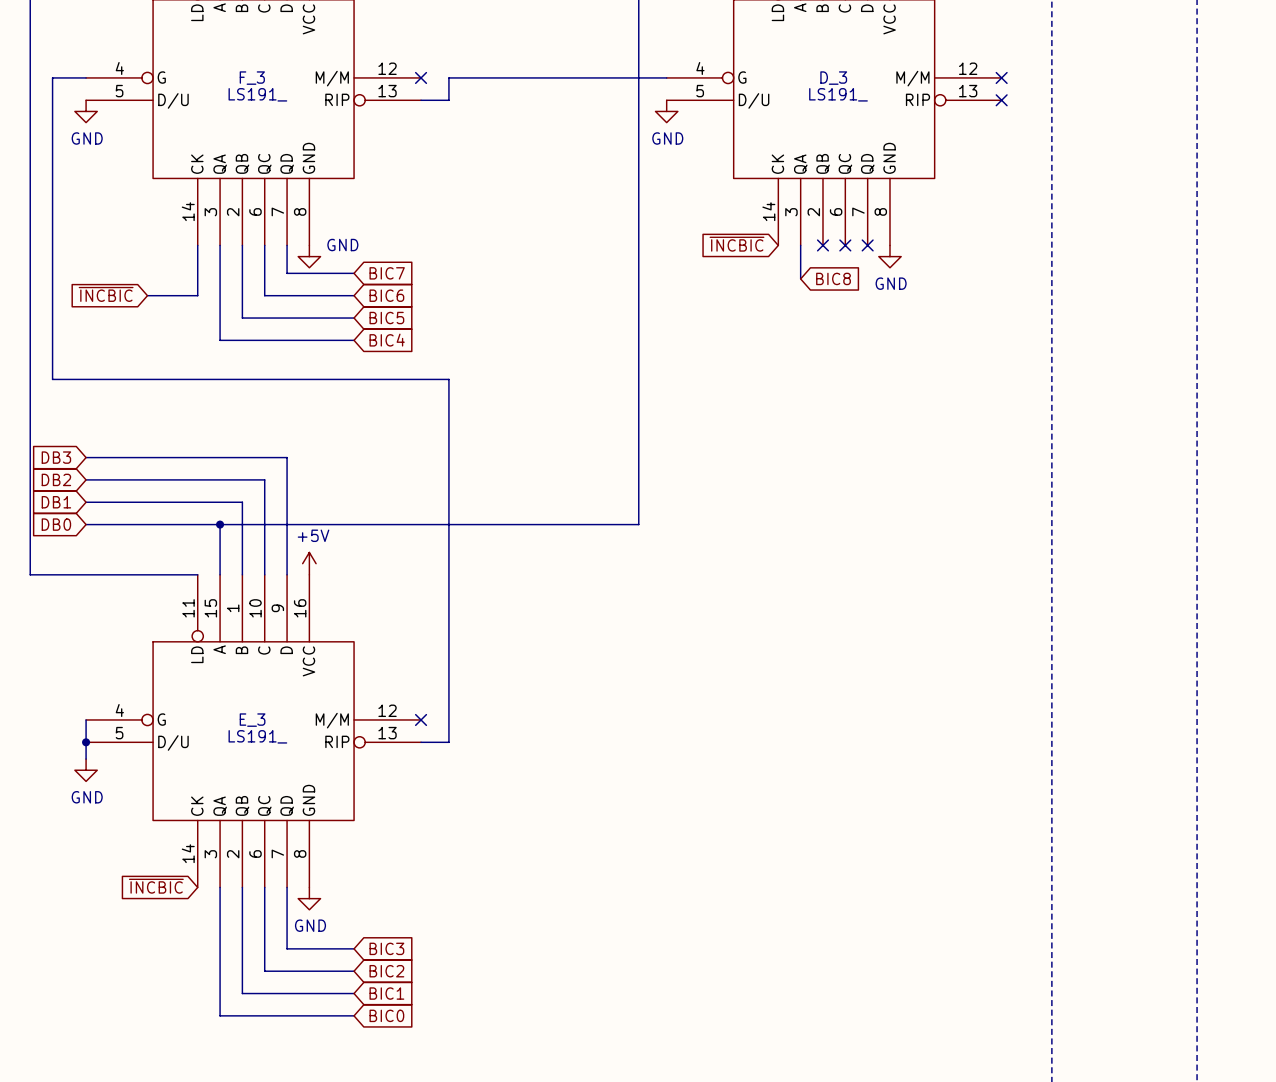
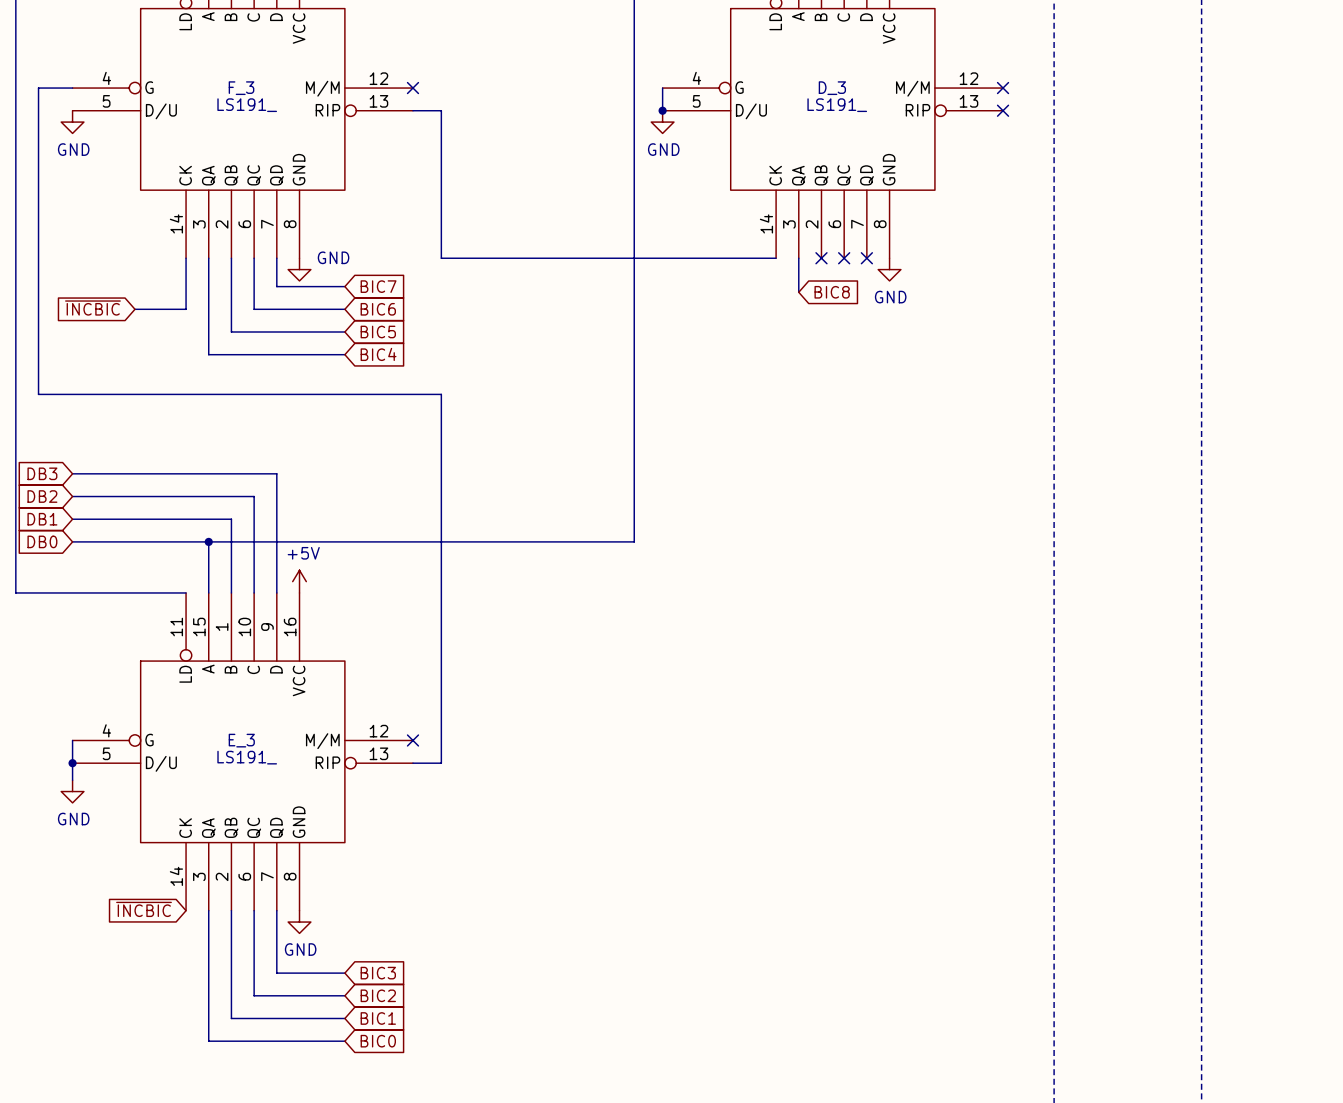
wire: (666, 77) (448, 77) (448, 100) -> (776, 258) (441, 258) (441, 110)
wire: none -> (662, 88) (662, 110)
junction: none -> (662, 110)
global label: ~{INCBIC} (736, 244) -> none

